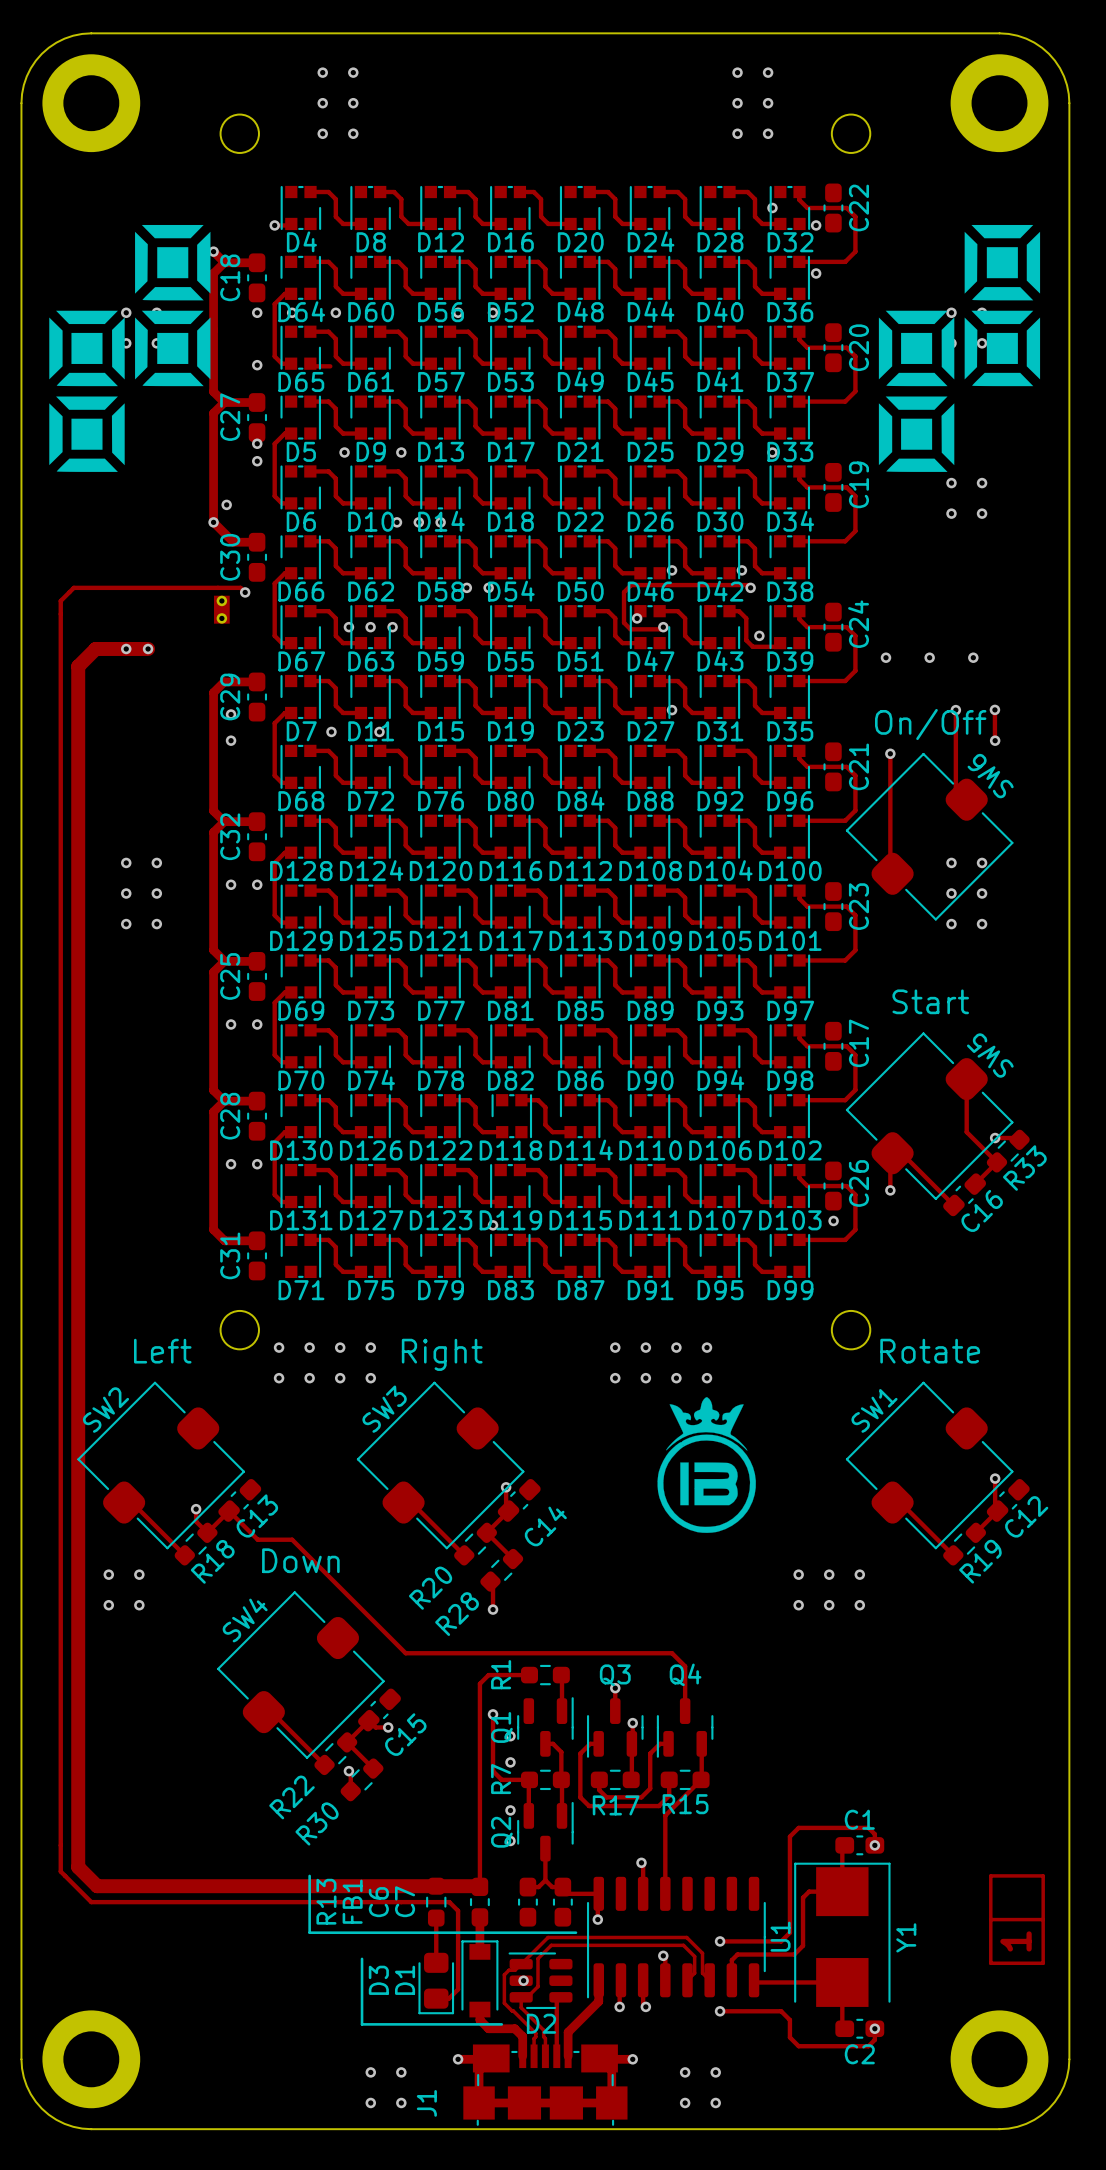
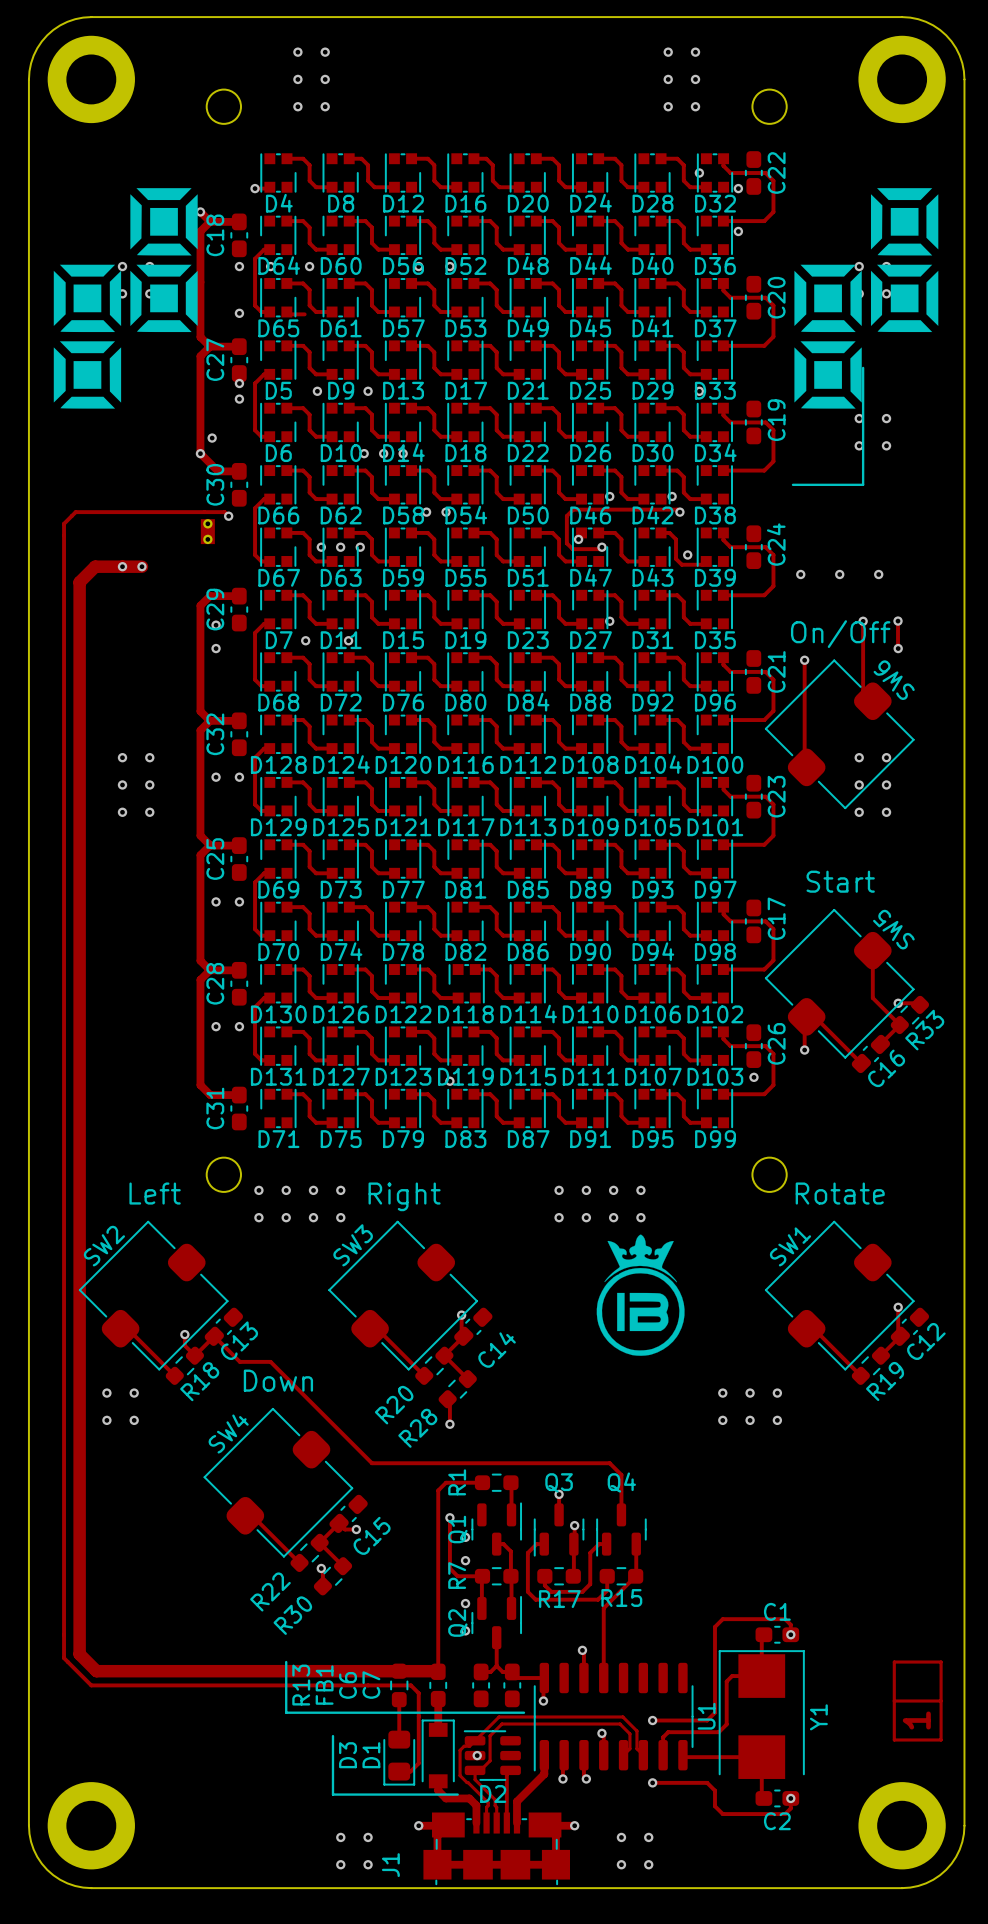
line: none -> (863, 367) (863, 484) (792, 484)

